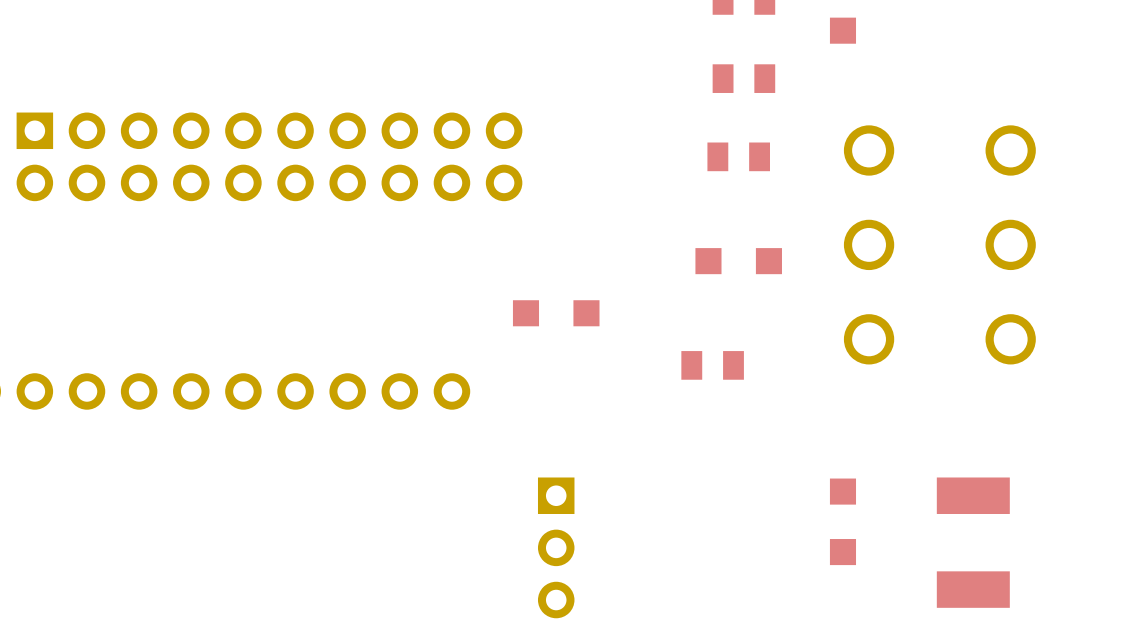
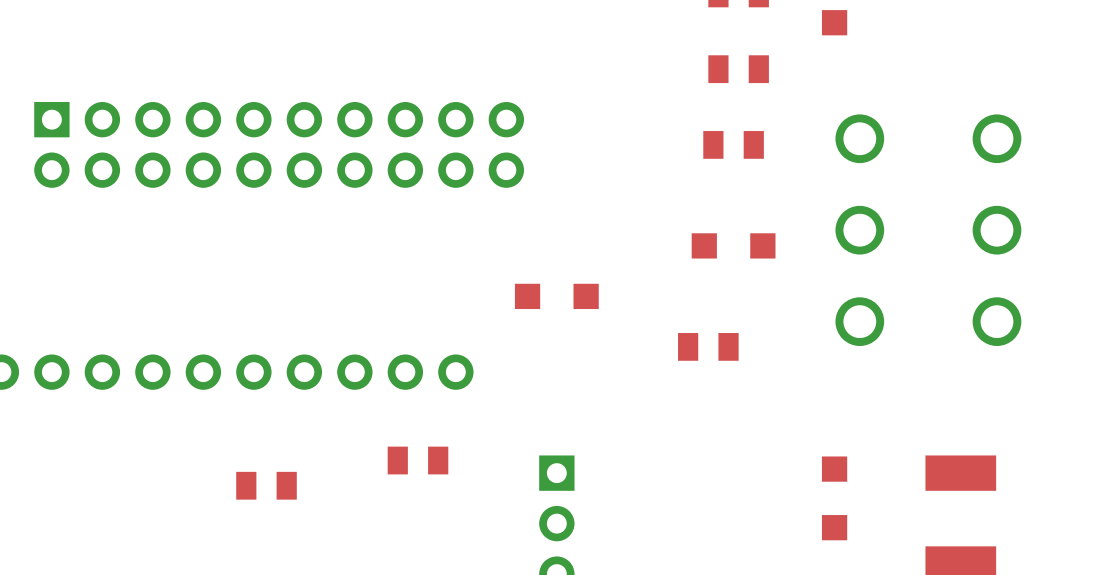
part: none -> (417, 460)
part: none -> (266, 485)

